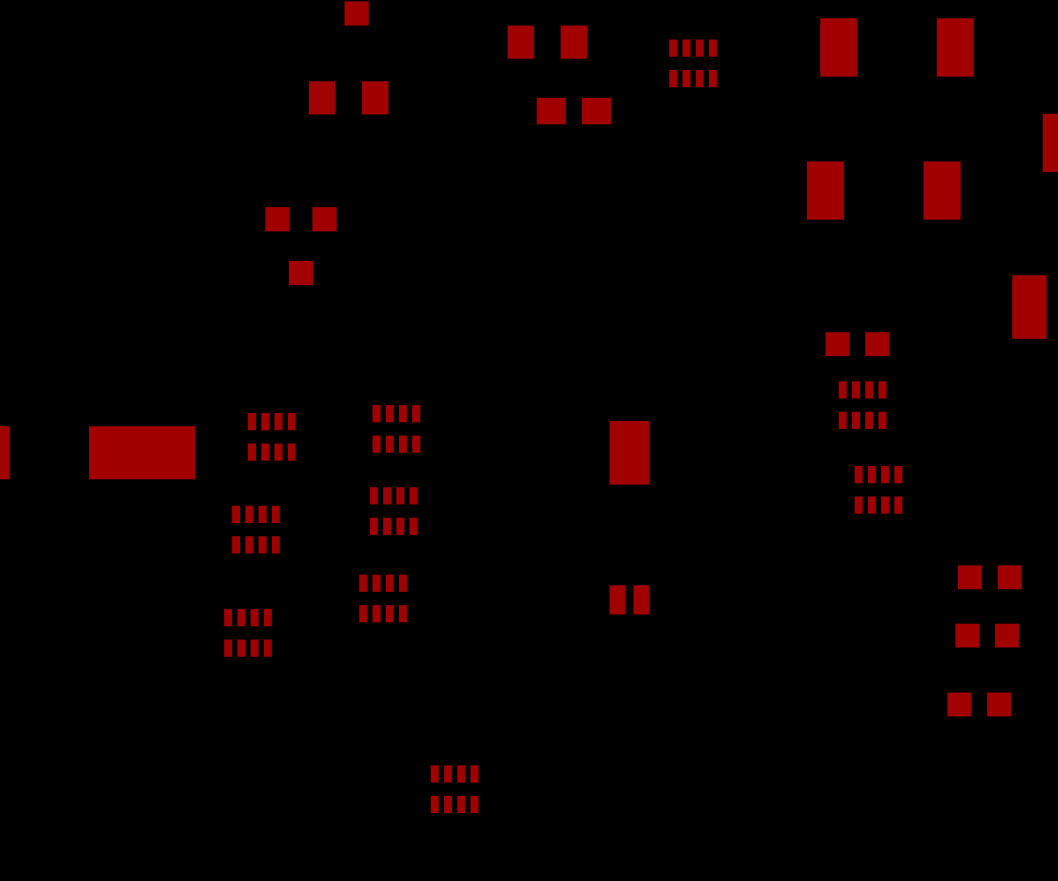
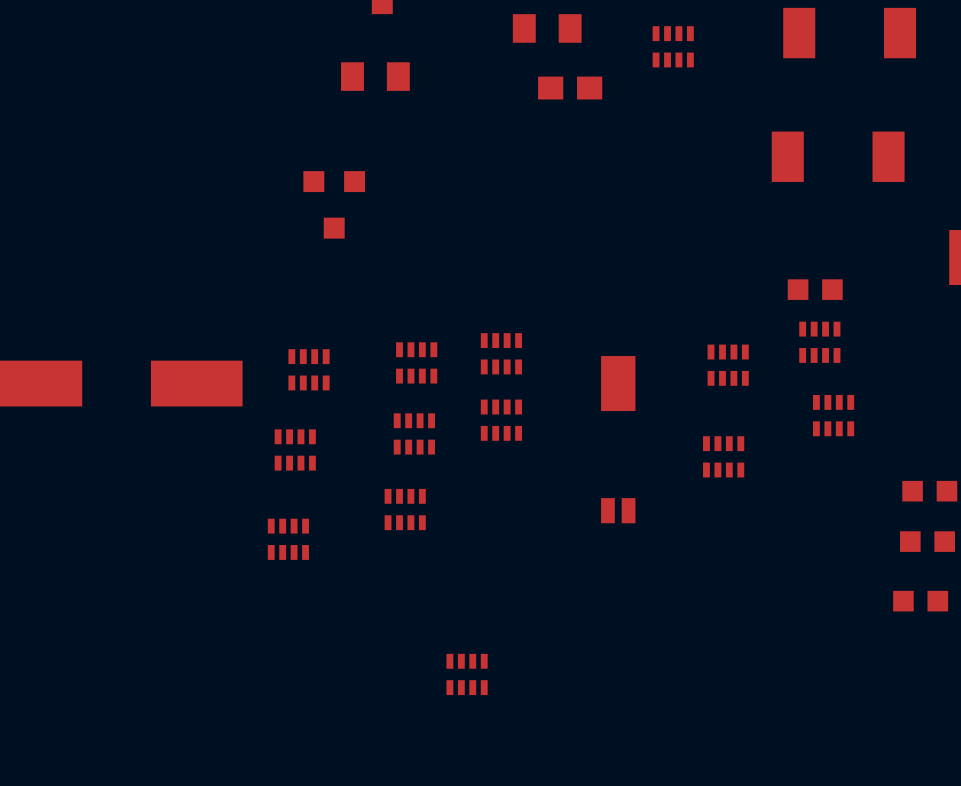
part: none -> (501, 353)
part: none -> (728, 365)
part: none -> (501, 420)
part: none -> (723, 456)

